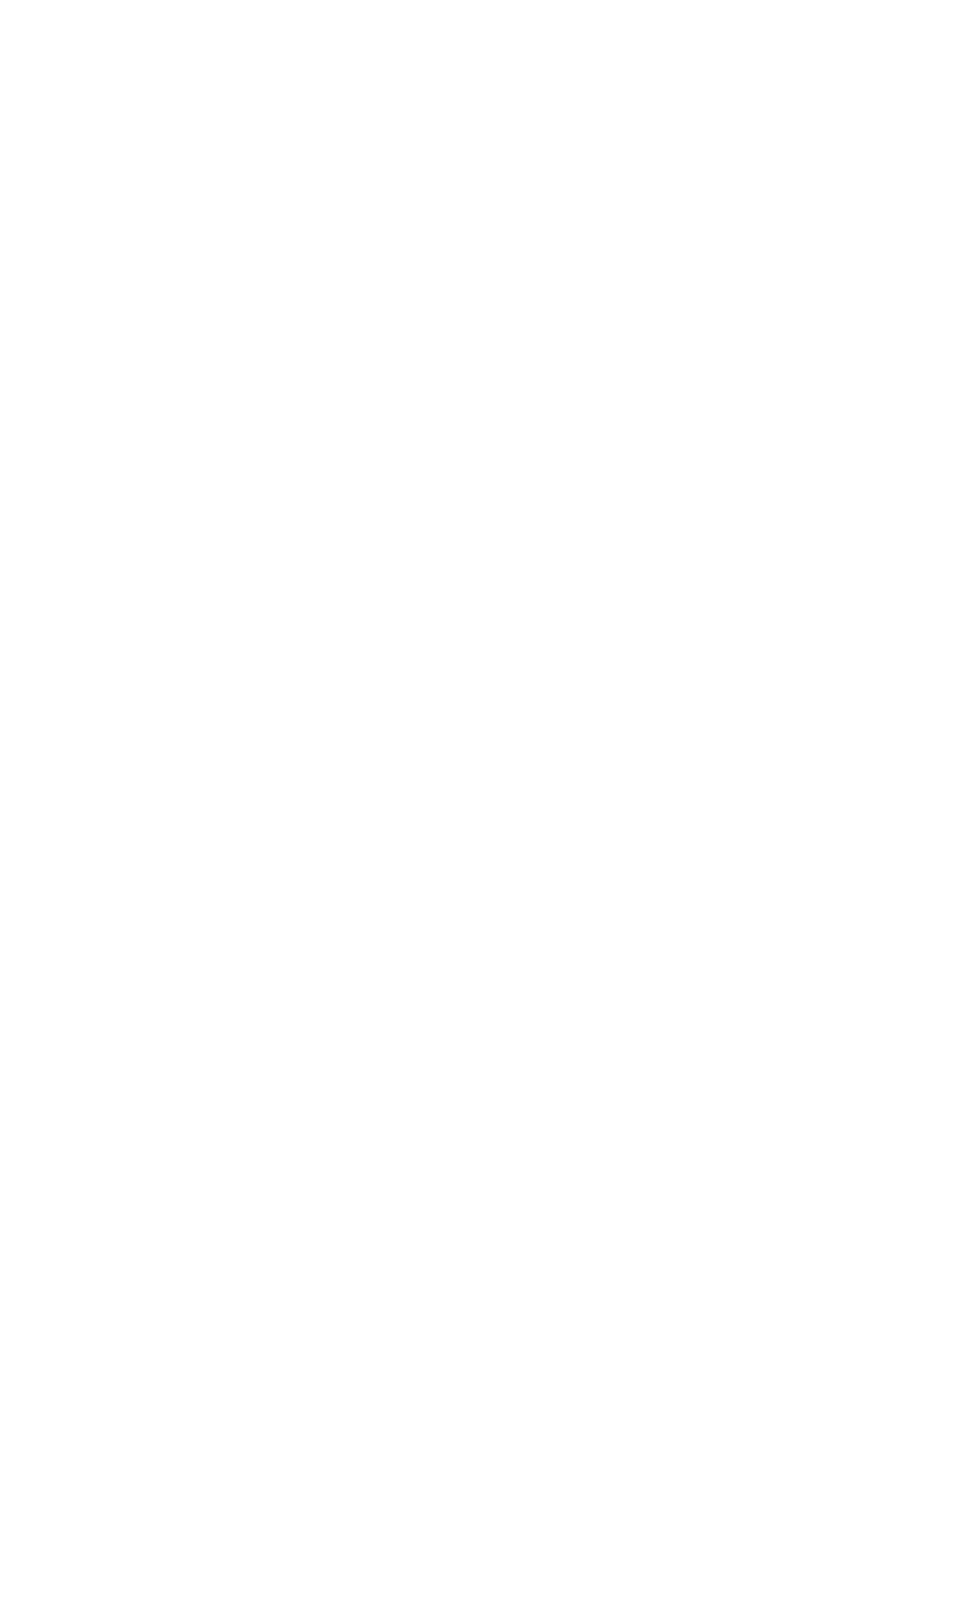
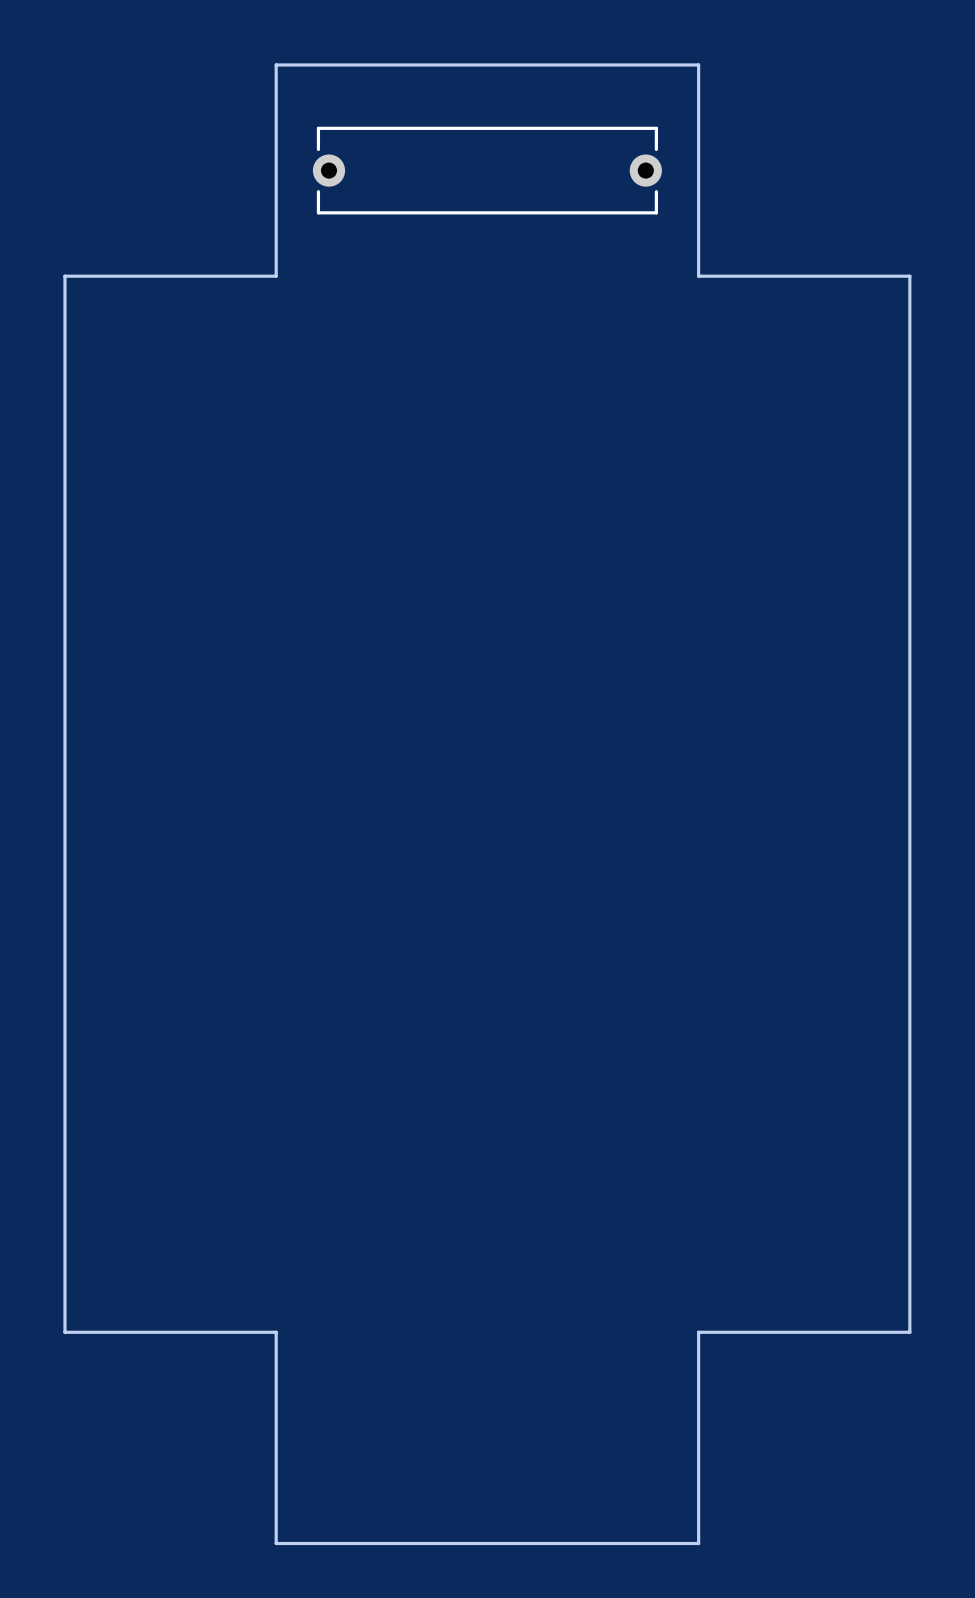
board edge: none -> (276, 64) (698, 64) (698, 276) (909, 276) (909, 1332) (698, 1332) (698, 1543) (276, 1543) (276, 1332) (64, 1332) (64, 276) (276, 276) (276, 64)
part: none -> (487, 170)

